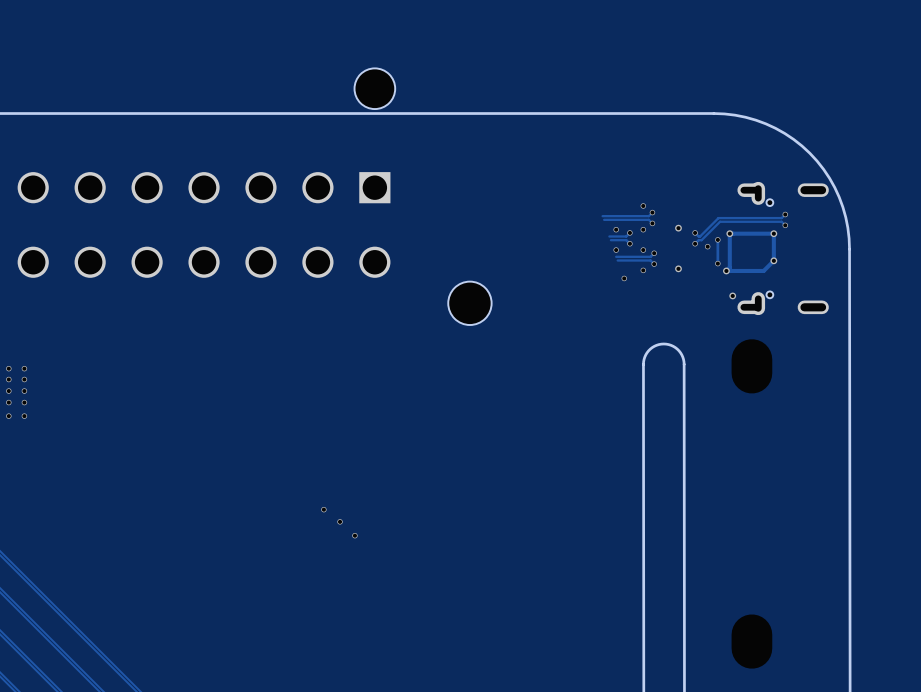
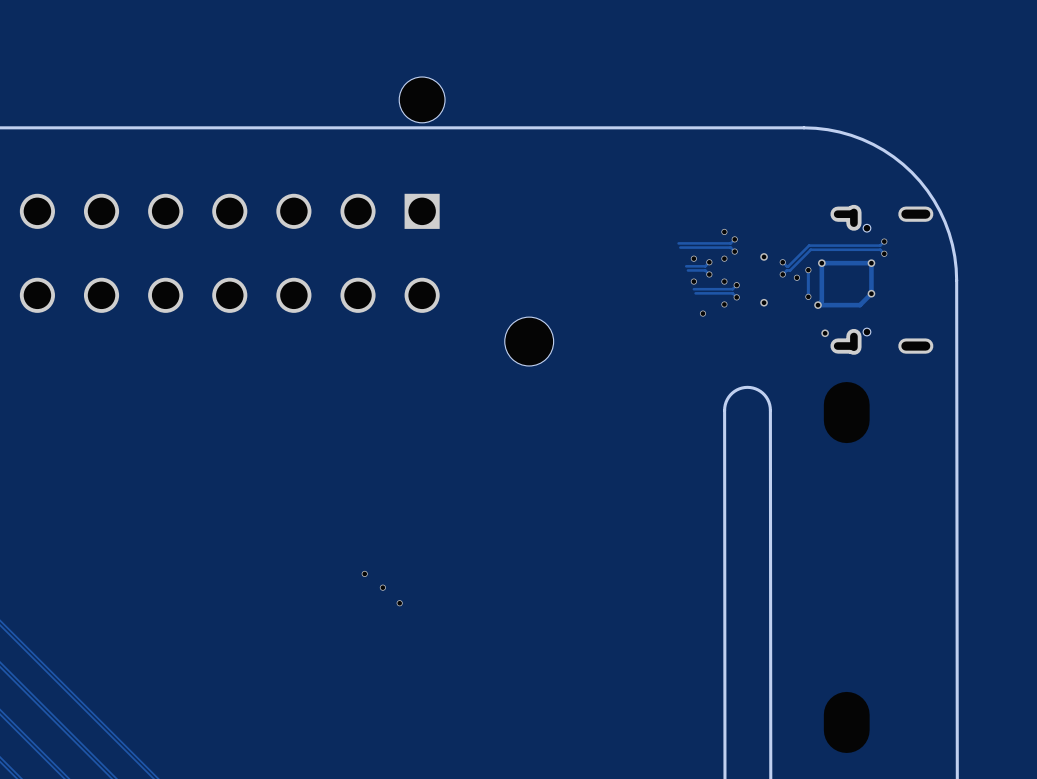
via: (8, 368) -> none
via: (24, 368) -> none
via: (8, 379) -> none
via: (24, 379) -> none
via: (8, 391) -> none
via: (24, 391) -> none
via: (8, 402) -> none
via: (24, 402) -> none
via: (8, 416) -> none
via: (24, 416) -> none

